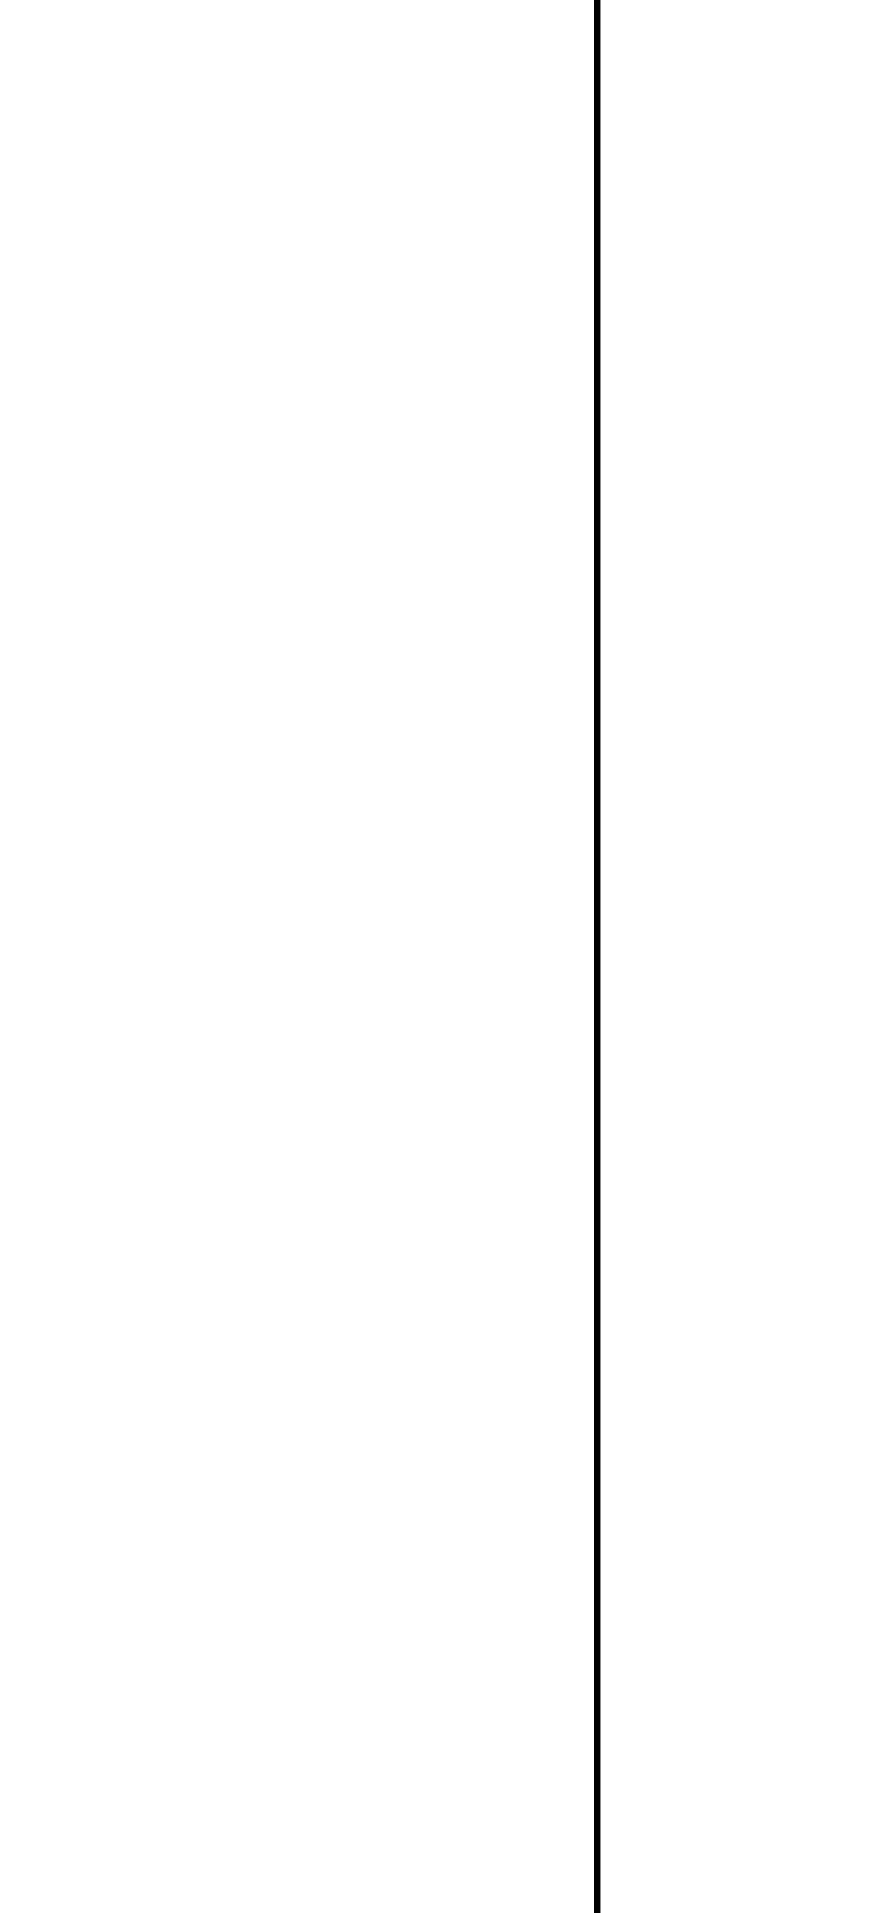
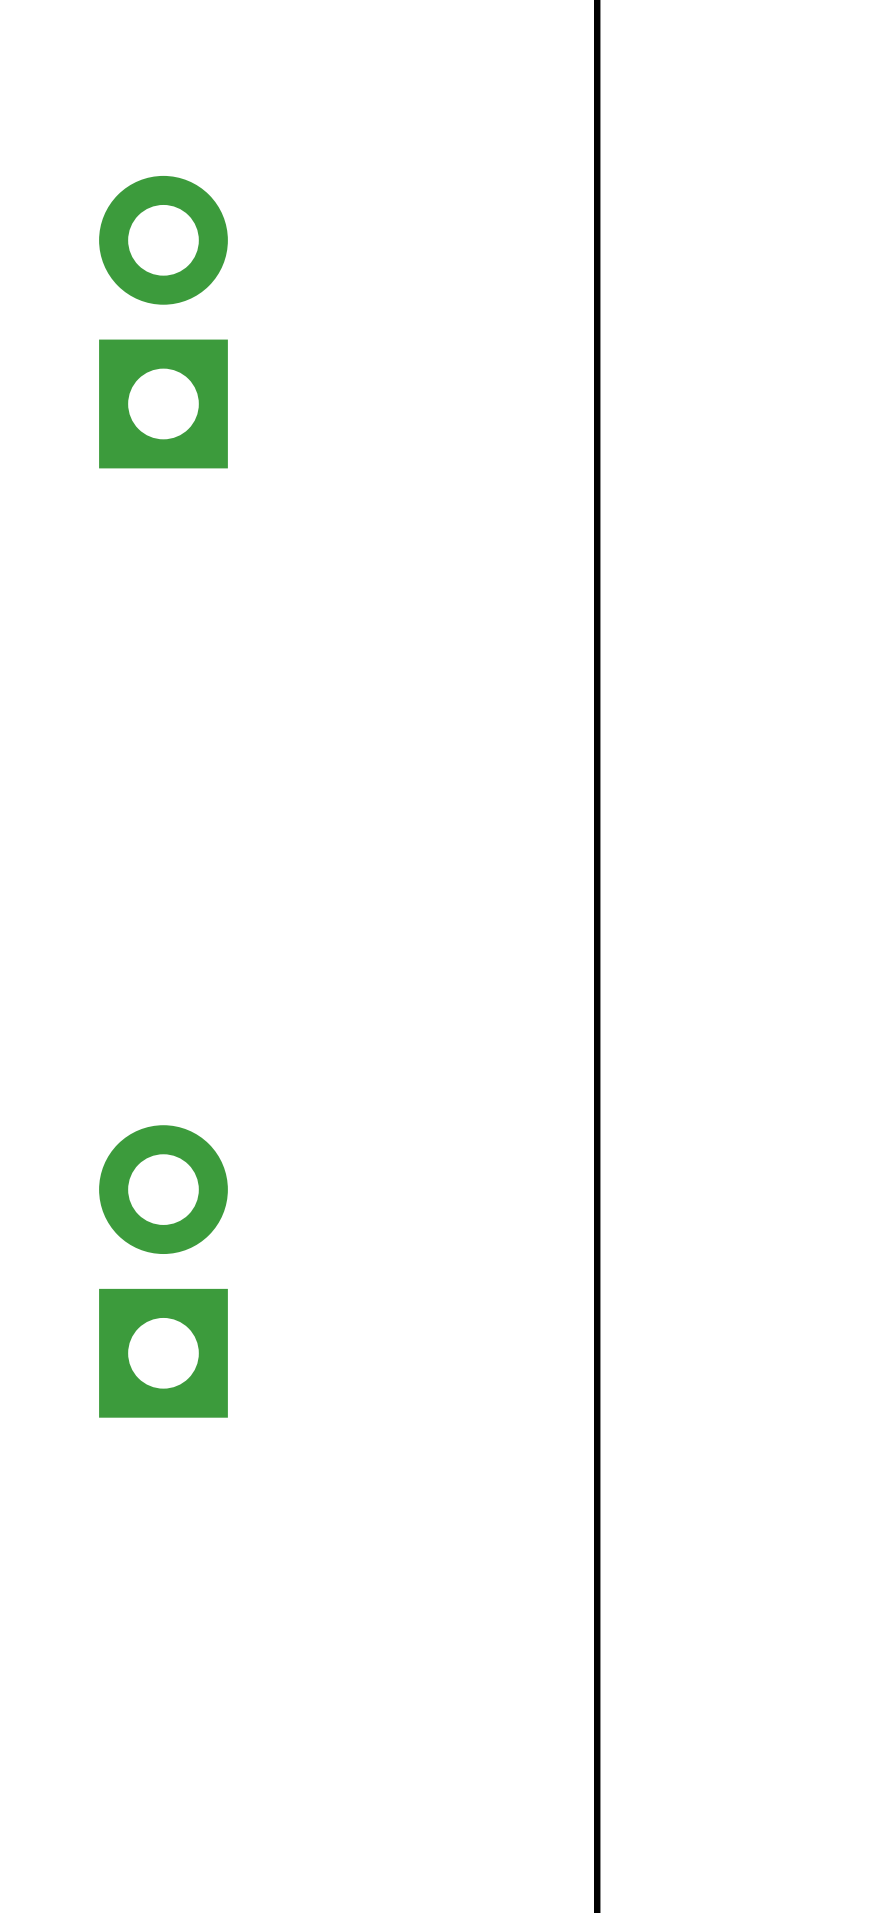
part: none -> (163, 322)
part: none -> (163, 1271)

